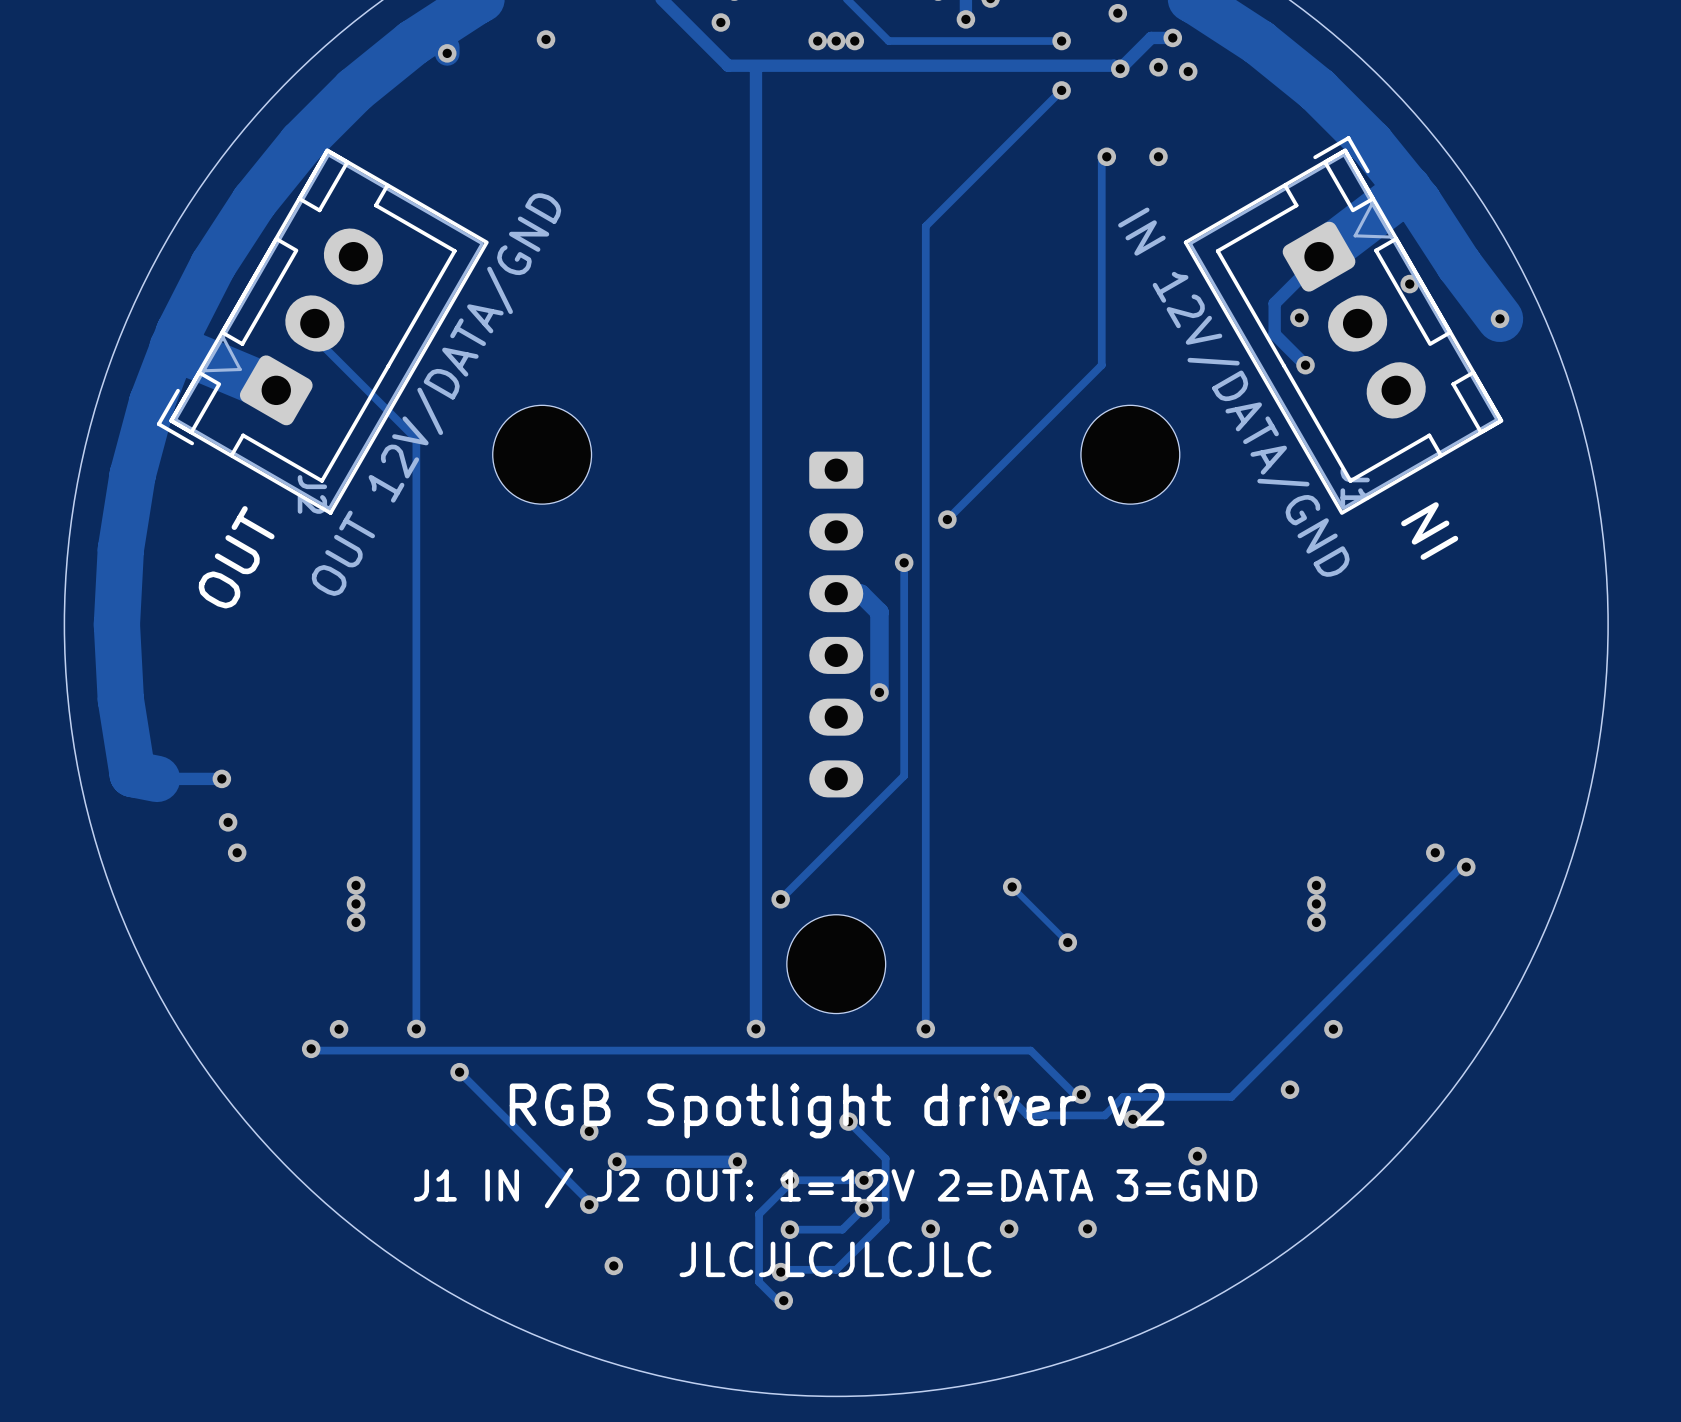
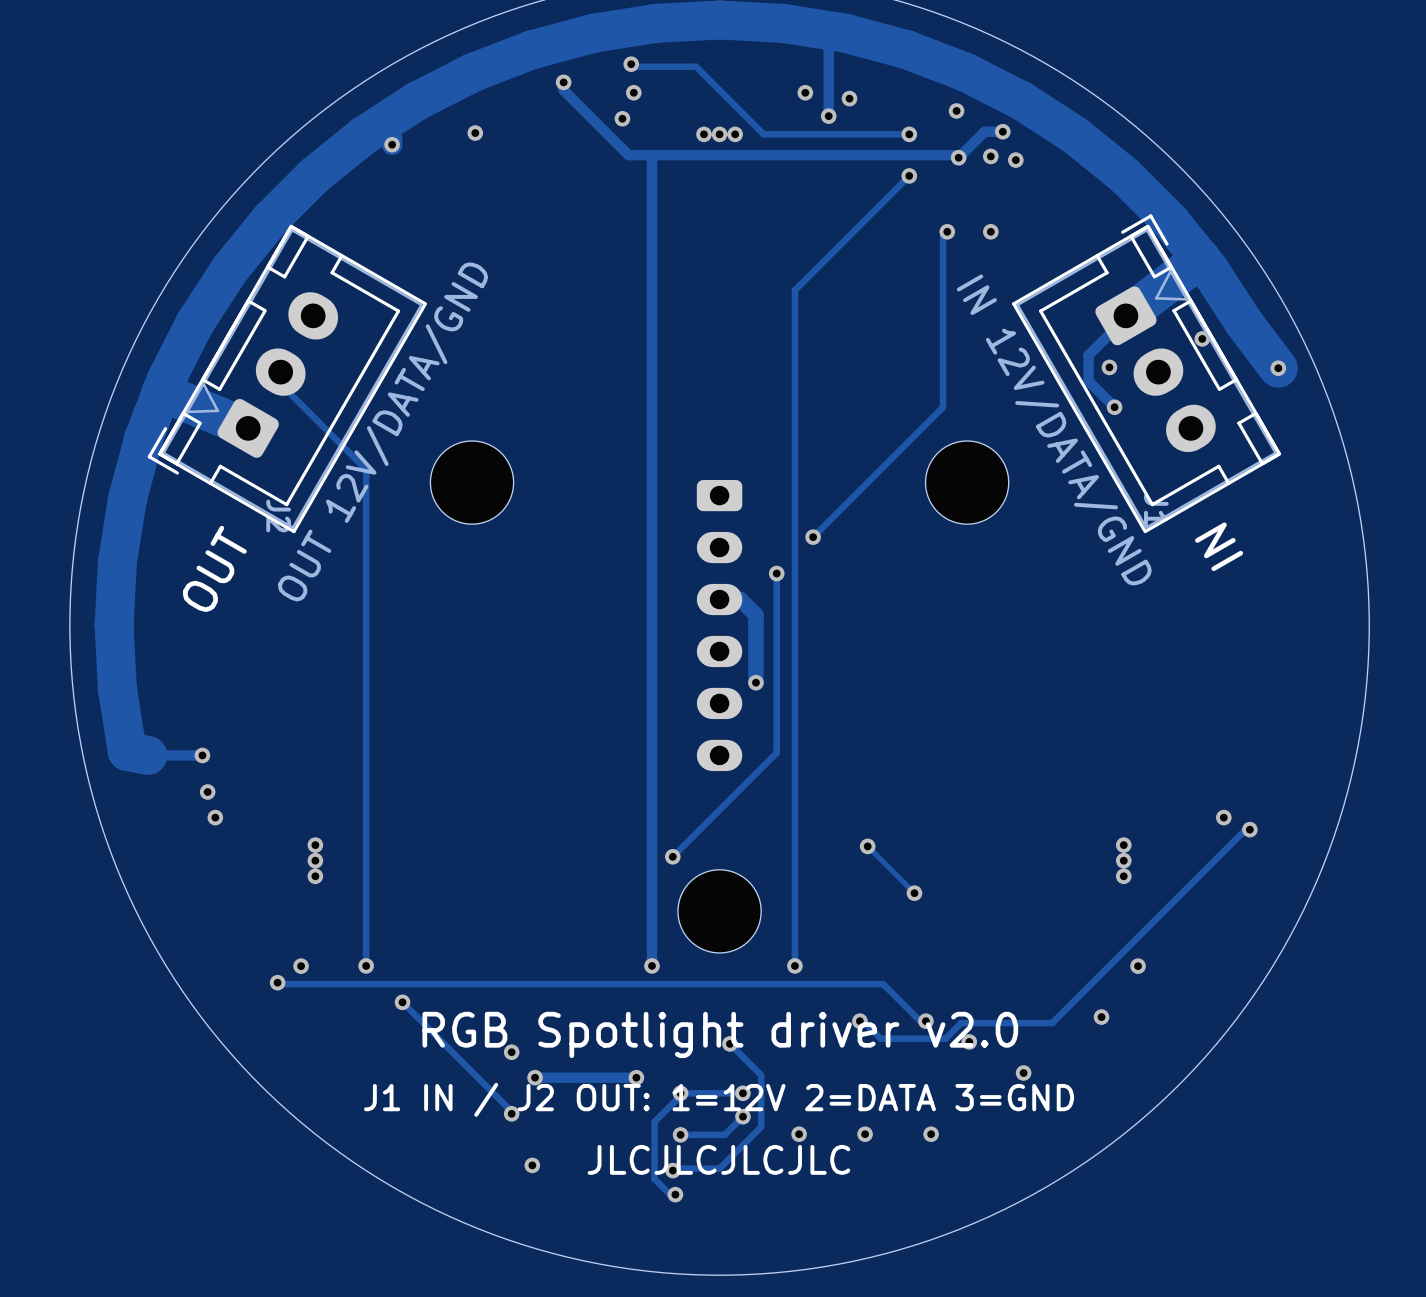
text: RGB Spotlight driver v2 (837, 1110) -> RGB Spotlight driver v2.0 (720, 1034)

